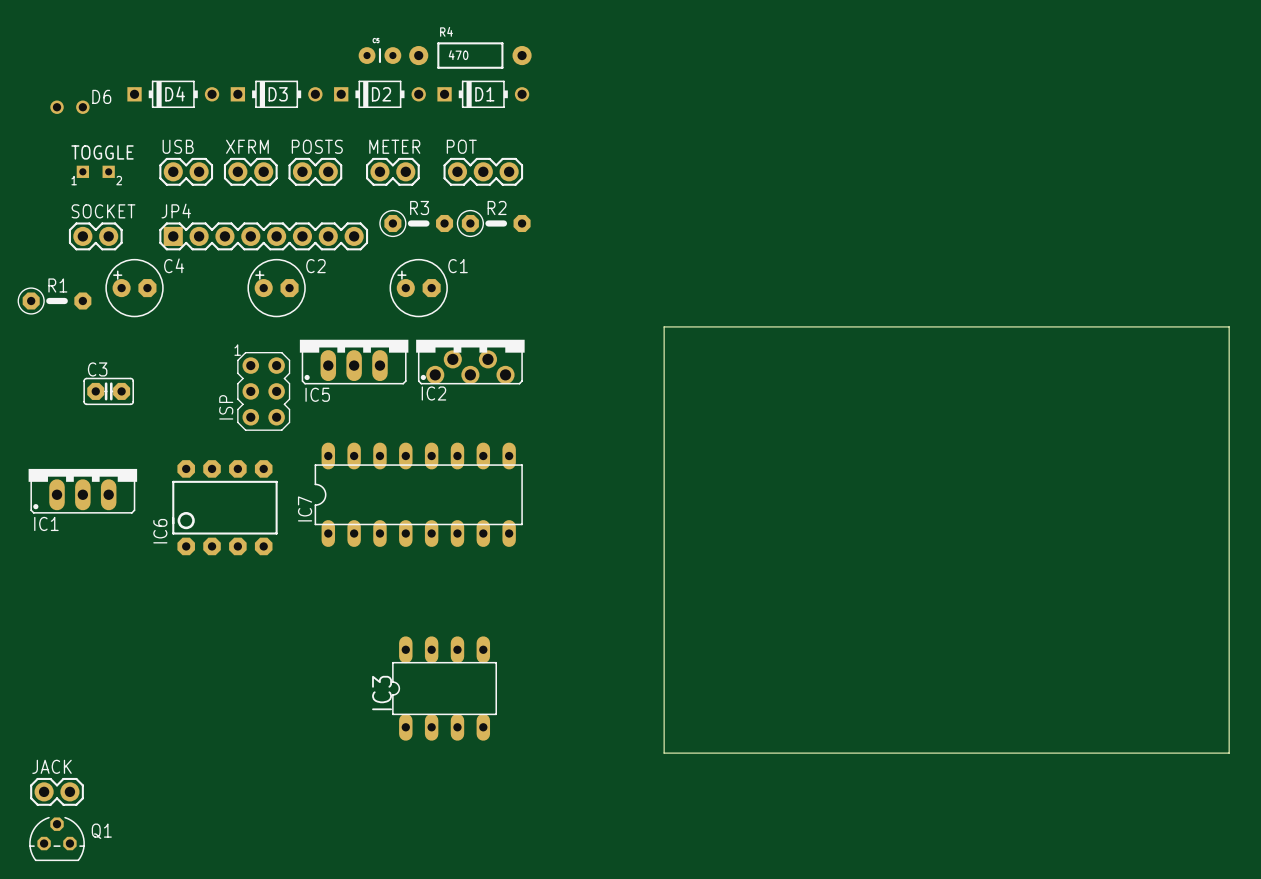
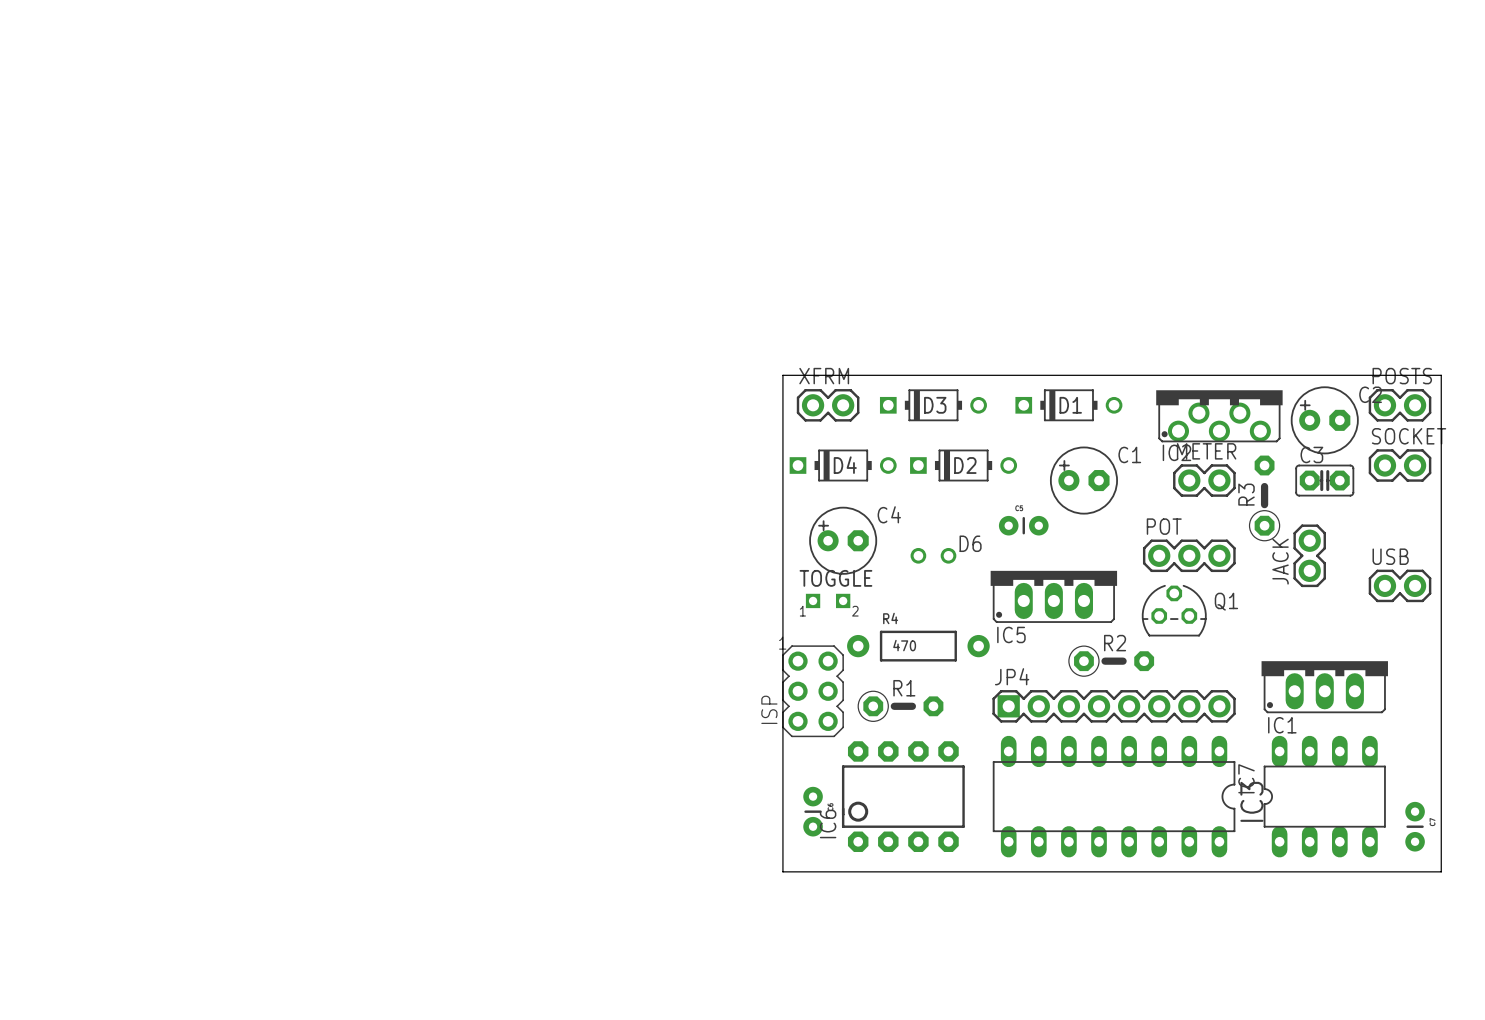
part position: (379, 55) -> (1023, 525)
R4 position: (470, 55) -> (918, 646)
D4 position: (173, 94) -> (843, 465)
D3 position: (276, 94) -> (933, 405)
D2 position: (379, 94) -> (963, 465)
D1 position: (483, 94) -> (1068, 405)
D6 position: (69, 107) -> (933, 555)
TOGGLE: (95, 171) -> none
USB: (186, 171) -> none
XFRM: (250, 171) -> none
POSTS: (315, 171) -> none
METER: (392, 171) -> none
POT: (483, 171) -> none
R3 rotation: 0° (416, 223) -> 90° counterclockwise (1264, 498)
R3 position: (416, 223) -> (1264, 498)
R2 position: (493, 223) -> (1111, 661)
SOCKET: (95, 236) -> none
JP4 position: (263, 236) -> (1114, 706)
C4 position: (134, 288) -> (843, 540)
C2 position: (276, 288) -> (1324, 420)
C1 position: (418, 288) -> (1083, 480)
R1 position: (54, 301) -> (900, 706)
XFRM: none -> (828, 405)
POSTS: none -> (1400, 405)
IC5 position: (354, 362) -> (1053, 596)
IC2 position: (470, 362) -> (1219, 416)
C3 position: (108, 391) -> (1324, 480)
ISP: (263, 391) -> none
SOCKET: none -> (1400, 465)
METER: none -> (1204, 480)
POT: none -> (1189, 555)
JACK: none -> (1309, 555)
IC1 position: (82, 491) -> (1324, 687)
IC7 rotation: 0° (418, 494) -> 180° (1114, 796)
IC7 position: (418, 494) -> (1114, 796)
IC6 position: (224, 507) -> (903, 796)
USB: none -> (1400, 585)
TOGGLE: none -> (828, 600)
ISP: none -> (813, 691)
IC3 position: (444, 688) -> (1324, 796)
part: none -> (813, 811)
part: none -> (1415, 826)
JACK: (57, 791) -> none
Q1 position: (57, 838) -> (1174, 610)

